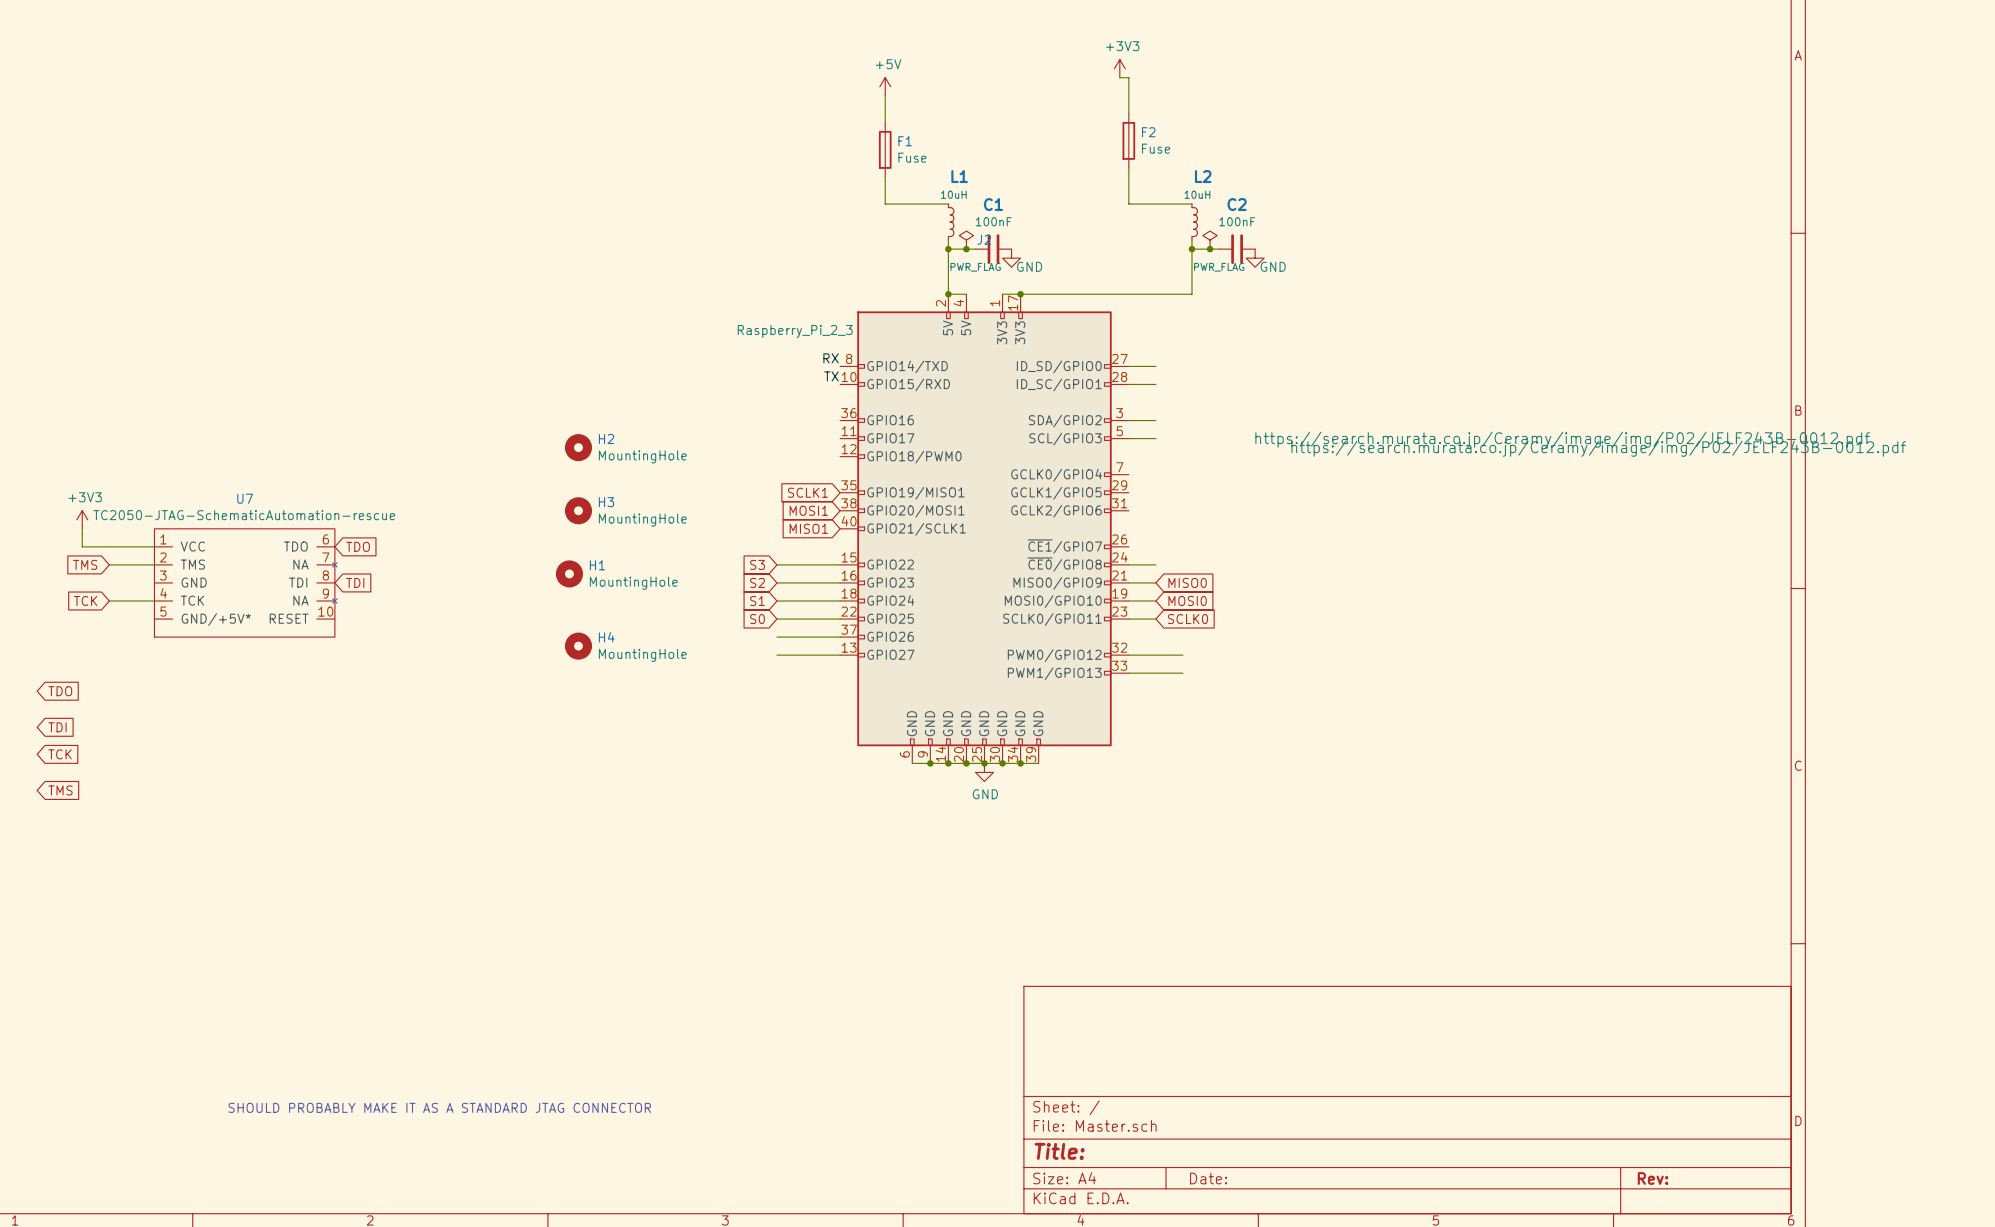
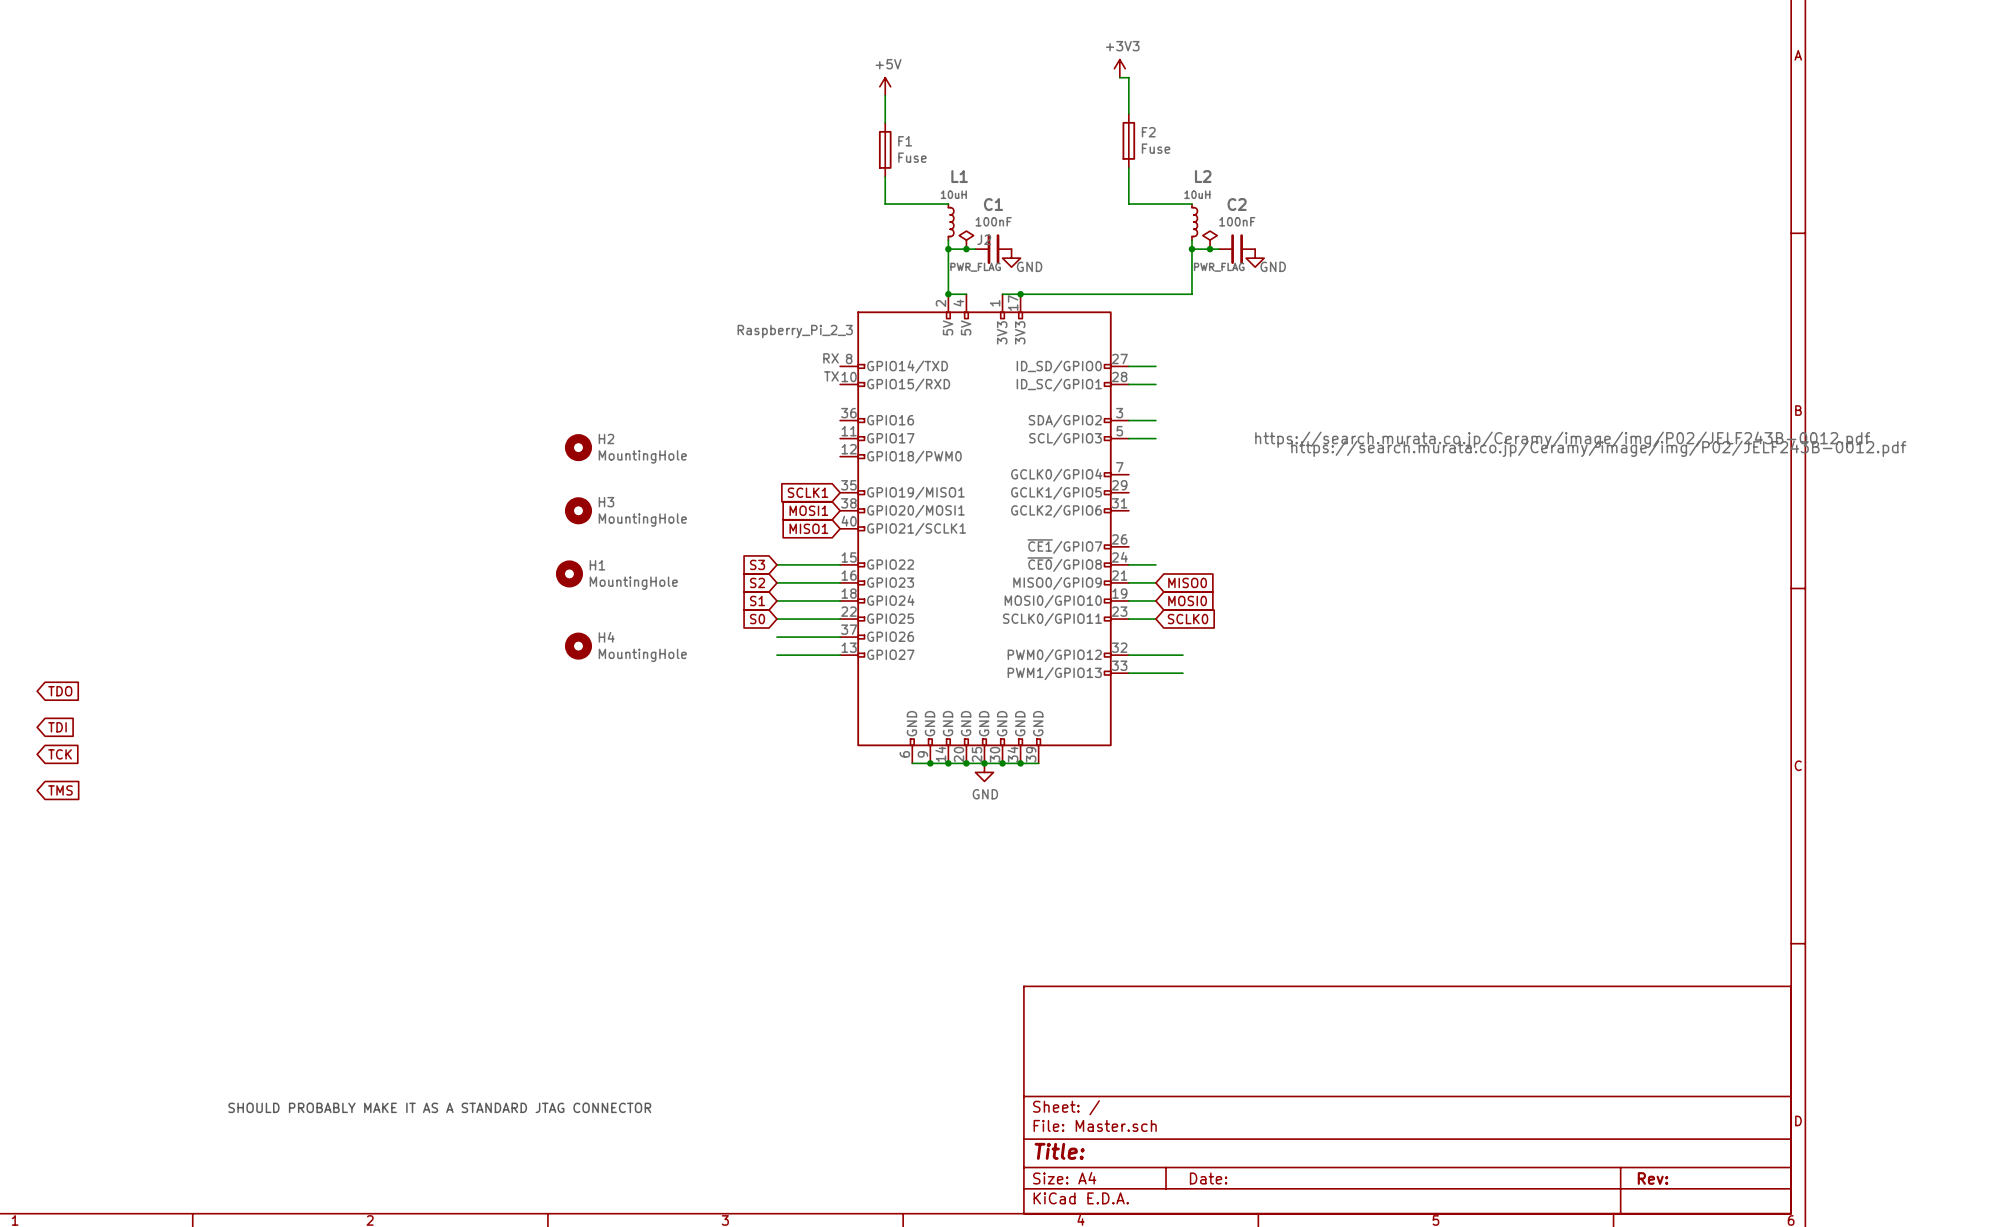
power symbol: +3V3 (82, 519) -> none
wire: (82, 528) (82, 546) (154, 546) -> none
global label: TDO (357, 546) -> none
global label: TMS (85, 564) -> none
wire: (109, 564) (154, 564) -> none
U7: TC2050-JTAG-SchematicAutomation-rescue (245, 582) -> none
global label: TDI (355, 582) -> none
global label: TCK (85, 600) -> none
wire: (109, 600) (154, 600) -> none

